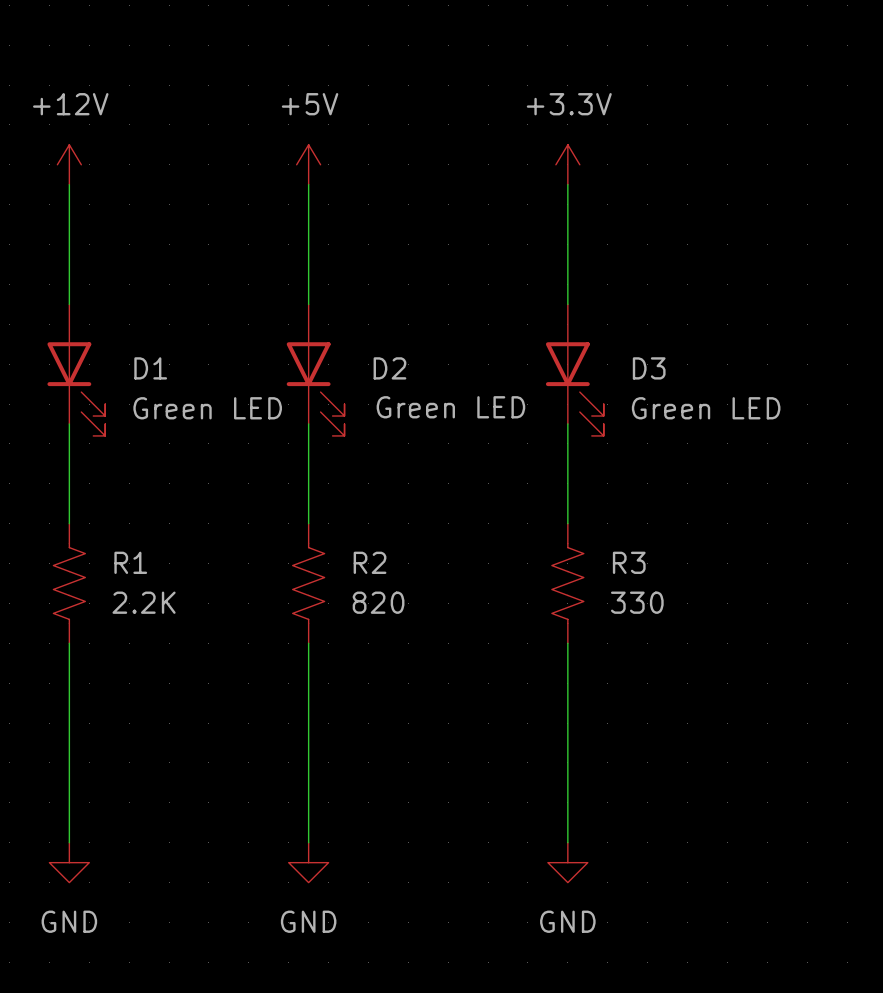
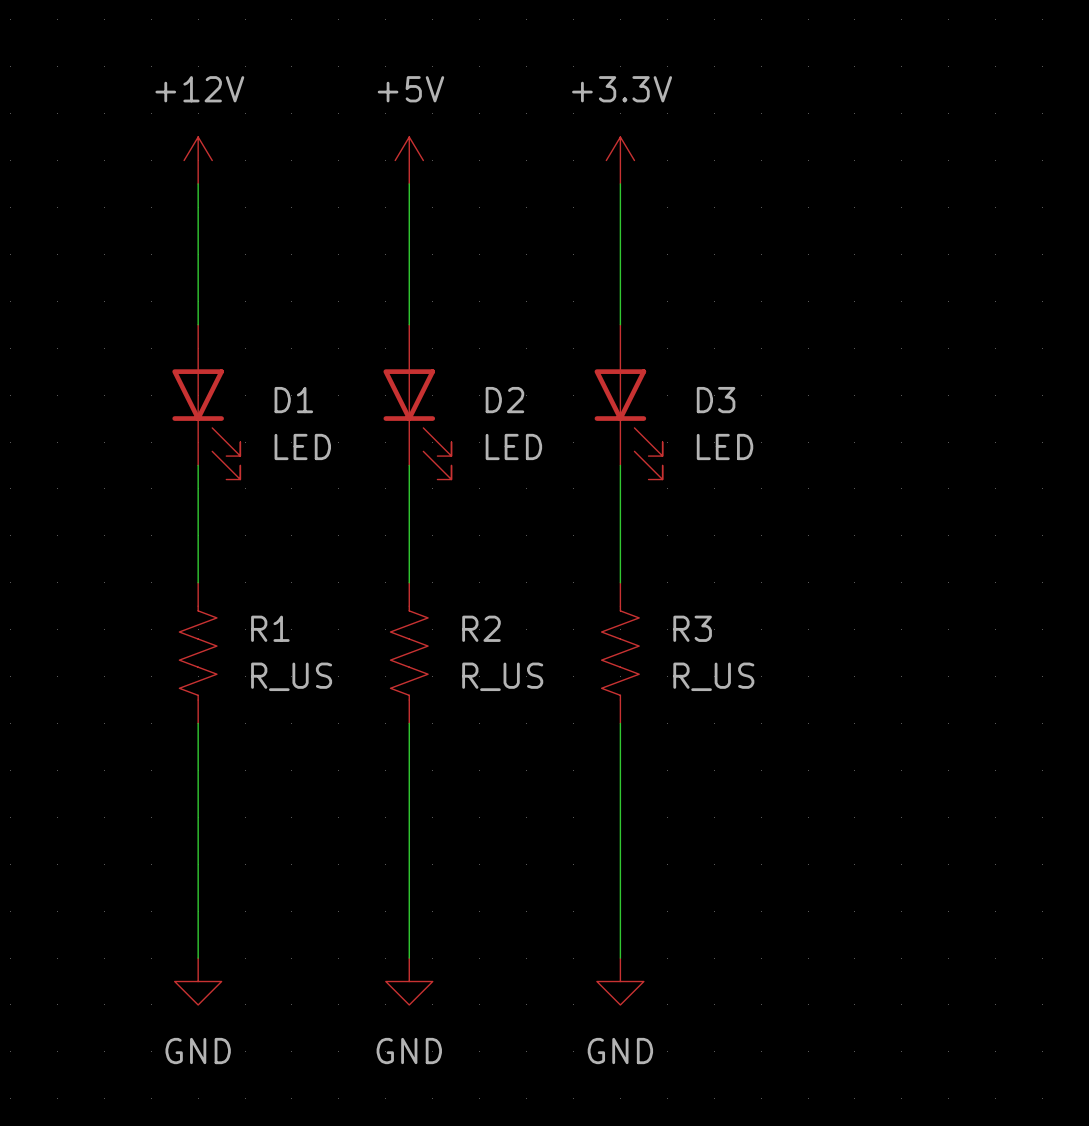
power symbol position: +12V (69, 164) -> +12V (198, 160)
power symbol position: +3.3V (567, 164) -> +3.3V (620, 160)
wire: (69, 184) (69, 304) -> (198, 183) (198, 324)
wire: (567, 184) (567, 304) -> (620, 183) (620, 324)
D1 position: (76, 370) -> (206, 402)
D3 position: (574, 370) -> (628, 402)
D2 value: Green LED (450, 407) -> LED (513, 446)
D1 value: Green LED (207, 408) -> LED (302, 446)
D3 value: Green LED (706, 408) -> LED (725, 446)
wire: (69, 423) (69, 523) -> (198, 465) (198, 582)
wire: (567, 423) (567, 523) -> (620, 465) (620, 582)
R1 position: (69, 583) -> (198, 653)
R3 position: (567, 583) -> (620, 653)
R1 value: 2.2K (144, 602) -> R_US (291, 676)
R2 value: 820 (378, 602) -> R_US (502, 676)
R3 value: 330 (637, 602) -> R_US (713, 676)
wire: (69, 643) (69, 842) -> (198, 723) (198, 958)
wire: (567, 643) (567, 842) -> (620, 723) (620, 958)
power symbol position: GND (69, 862) -> GND (198, 981)
power symbol position: GND (567, 862) -> GND (620, 981)

